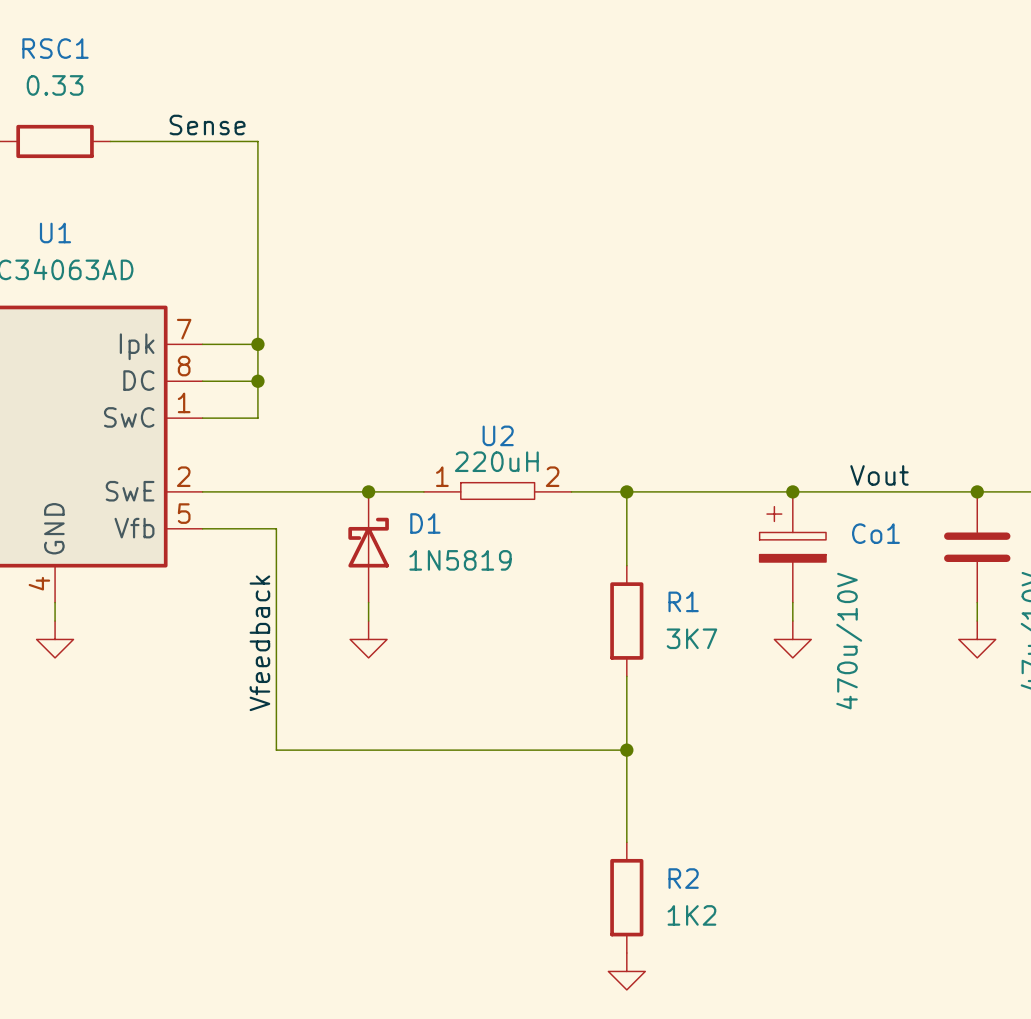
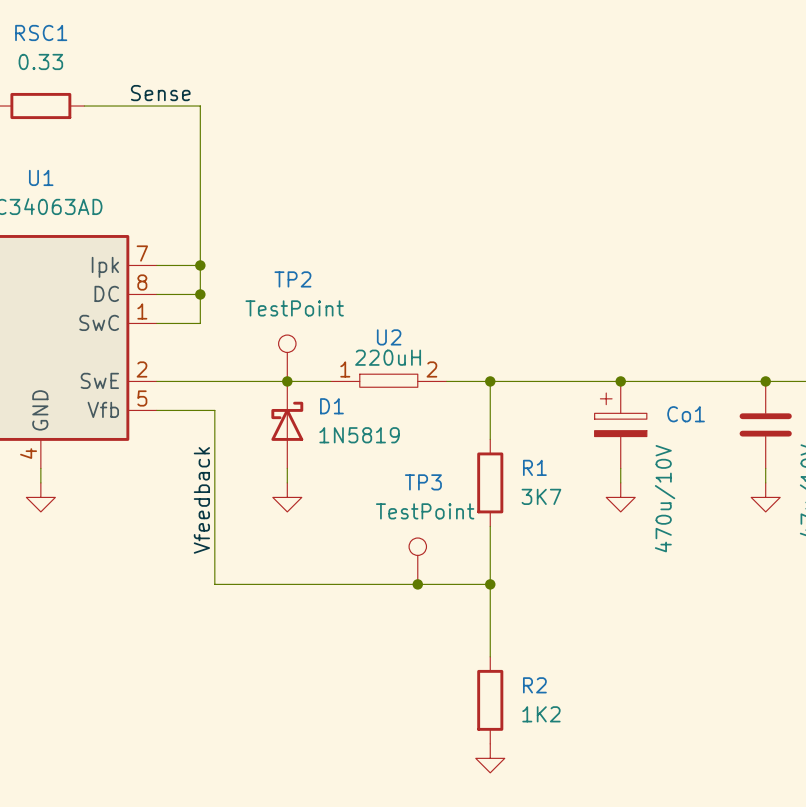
TP2: none -> TestPoint (287, 358)
label: Vout (879, 475) -> none
TP3: none -> TestPoint (417, 561)
junction: none -> (417, 584)

